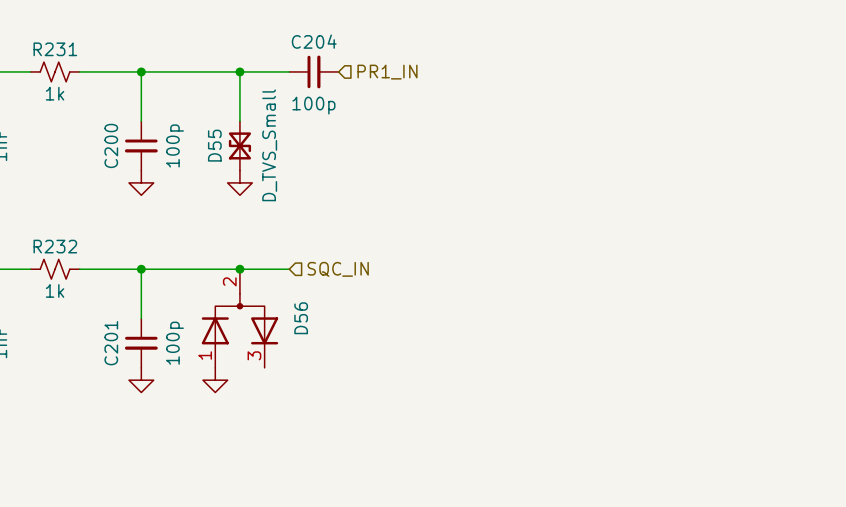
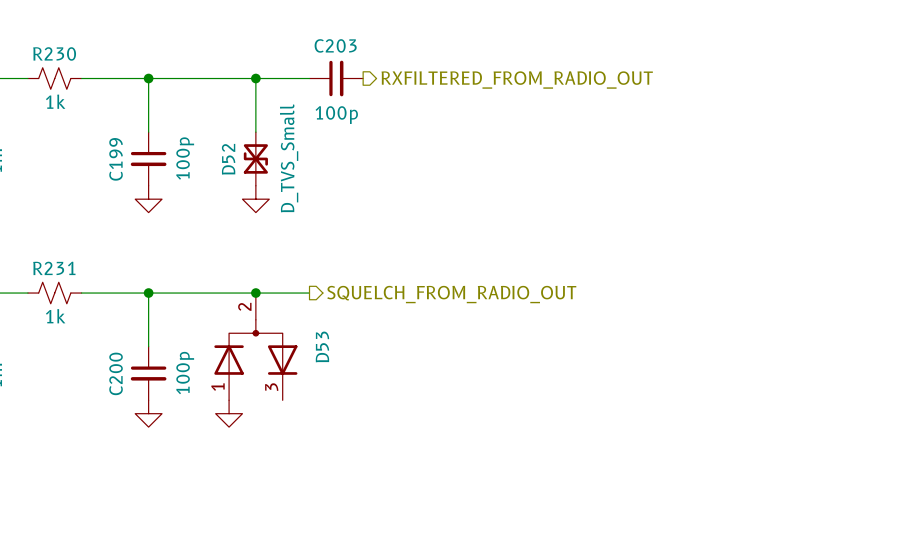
C204 name: C204 (314, 41) -> C203 (335, 45)
R231 name: R231 (55, 49) -> R230 (54, 53)
hierarchical label shape: input (387, 72) -> output (517, 80)
hierarchical label: PR1_IN (387, 72) -> RXFILTERED_FROM_RADIO_OUT (517, 80)
C200 name: C200 (111, 145) -> C199 (116, 159)
D55 name: D55 (214, 145) -> D52 (228, 159)
R232 name: R232 (55, 246) -> R231 (54, 268)
hierarchical label shape: input (338, 269) -> output (451, 294)
hierarchical label: SQC_IN (338, 269) -> SQUELCH_FROM_RADIO_OUT (451, 294)
D56 name: D56 (301, 318) -> D53 (322, 346)
C201 name: C201 (111, 343) -> C200 (116, 373)

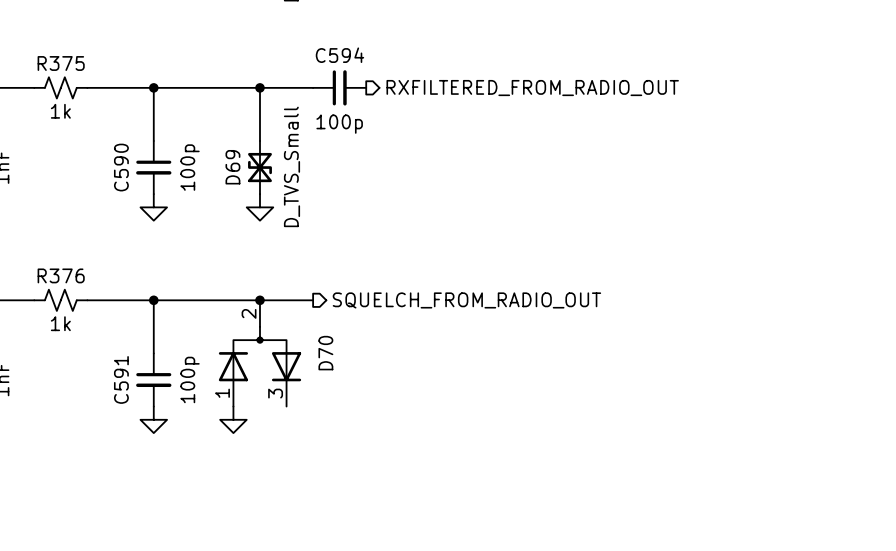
C203 name: C203 (335, 45) -> C594 (339, 55)
R230 name: R230 (54, 53) -> R375 (61, 63)
C199 name: C199 (116, 159) -> C590 (121, 167)
D52 name: D52 (228, 159) -> D69 (232, 167)
R231 name: R231 (54, 268) -> R376 (61, 275)
D53 name: D53 (322, 346) -> D70 (325, 353)
C200 name: C200 (116, 373) -> C591 (121, 379)

